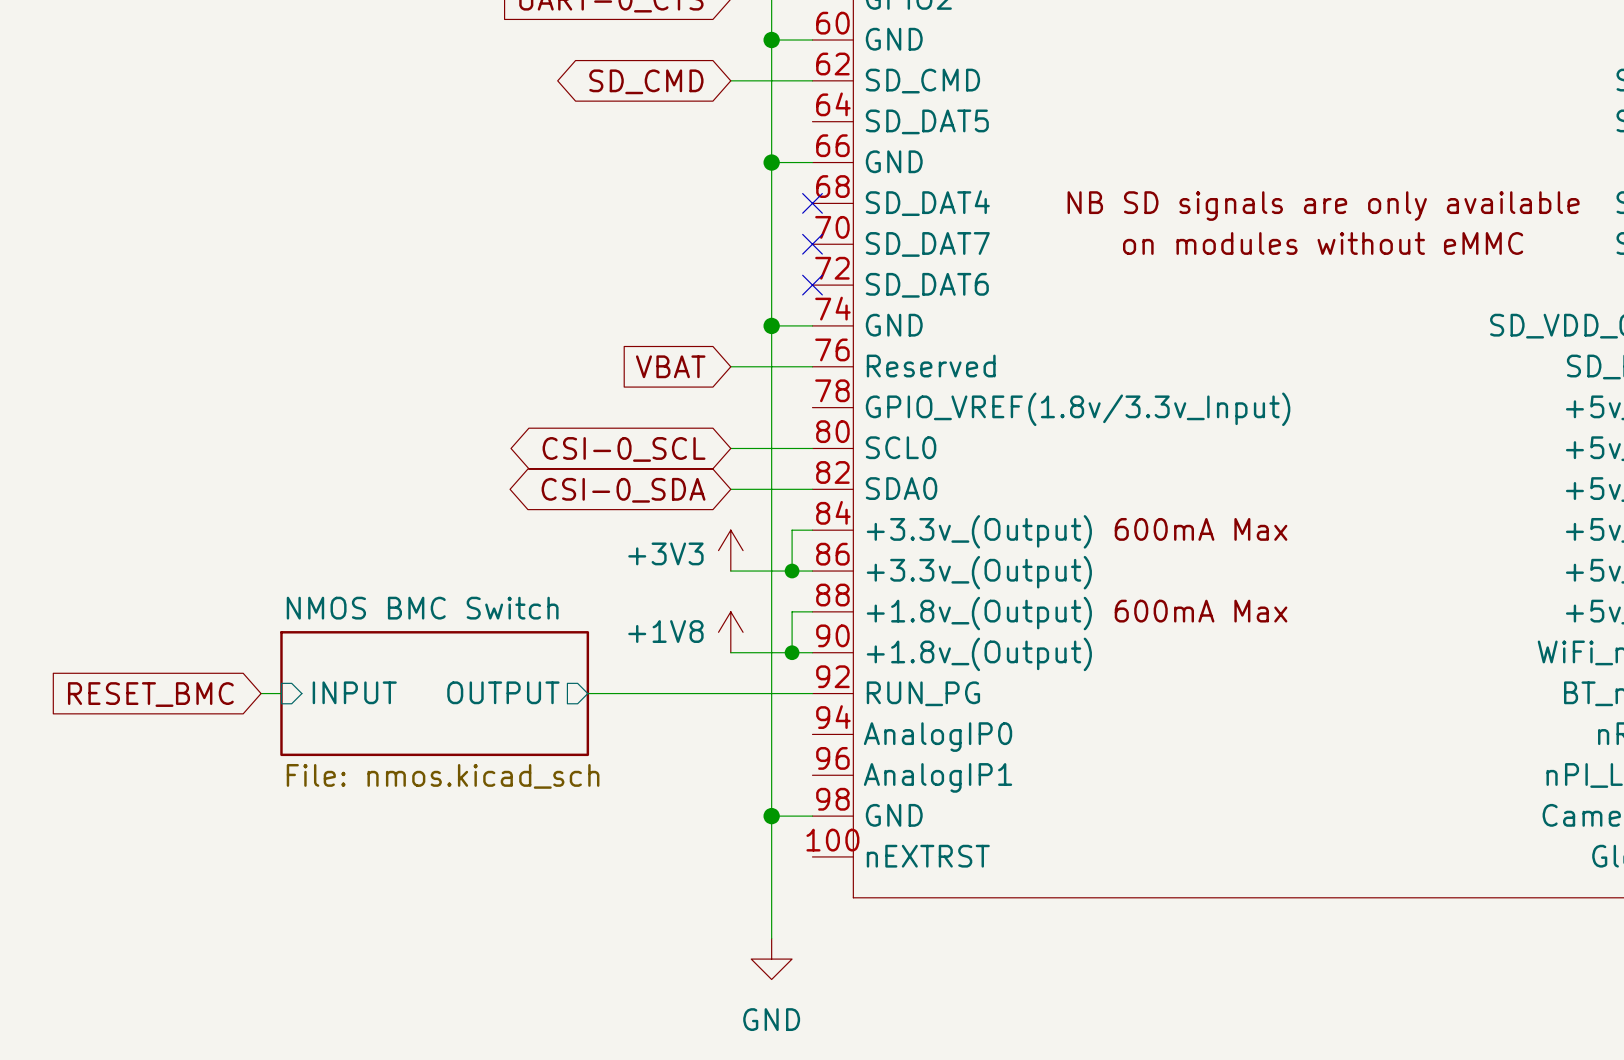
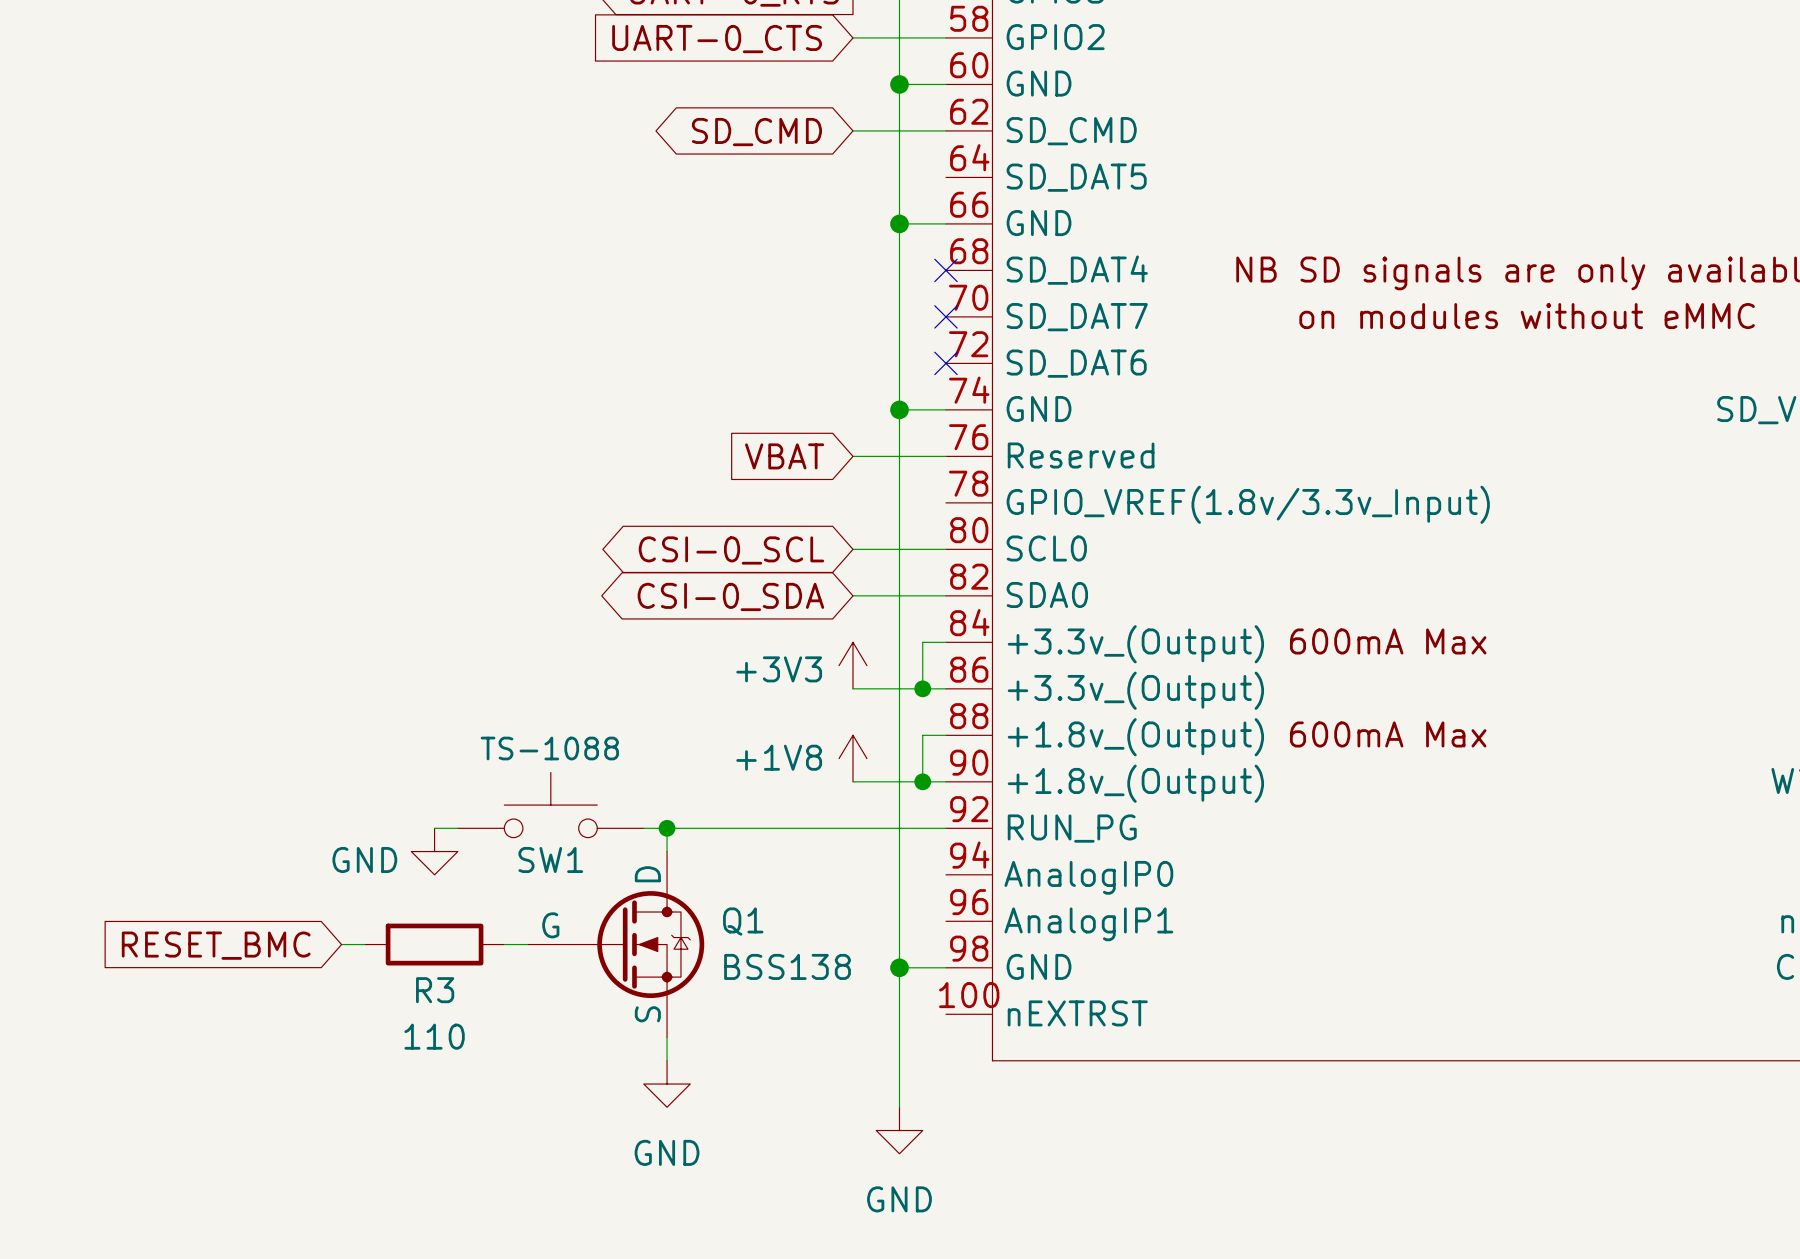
SW1: none -> TS-1088 (550, 805)
sheet pin: INPUT (354, 692) -> none
sheet pin: OUTPUT (503, 692) -> none
wire: (261, 693) (281, 693) -> (434, 828) (457, 828)
sheet NMOS BMC Switch: File: nmos.kicad_sch (434, 693) -> none
wire: none -> (643, 828) (690, 828)
wire: none -> (667, 828) (667, 851)
junction: none -> (667, 828)
global label position: RESET_BMC (150, 694) -> RESET_BMC (216, 945)
power symbol: none -> GND (434, 851)
wire: none -> (341, 944) (364, 944)
R3: none -> 110 (434, 944)
wire: none -> (504, 944) (527, 944)
Q1: none -> BSS138 (615, 944)
wire: none -> (667, 1037) (667, 1060)
power symbol: none -> GND (667, 1084)

